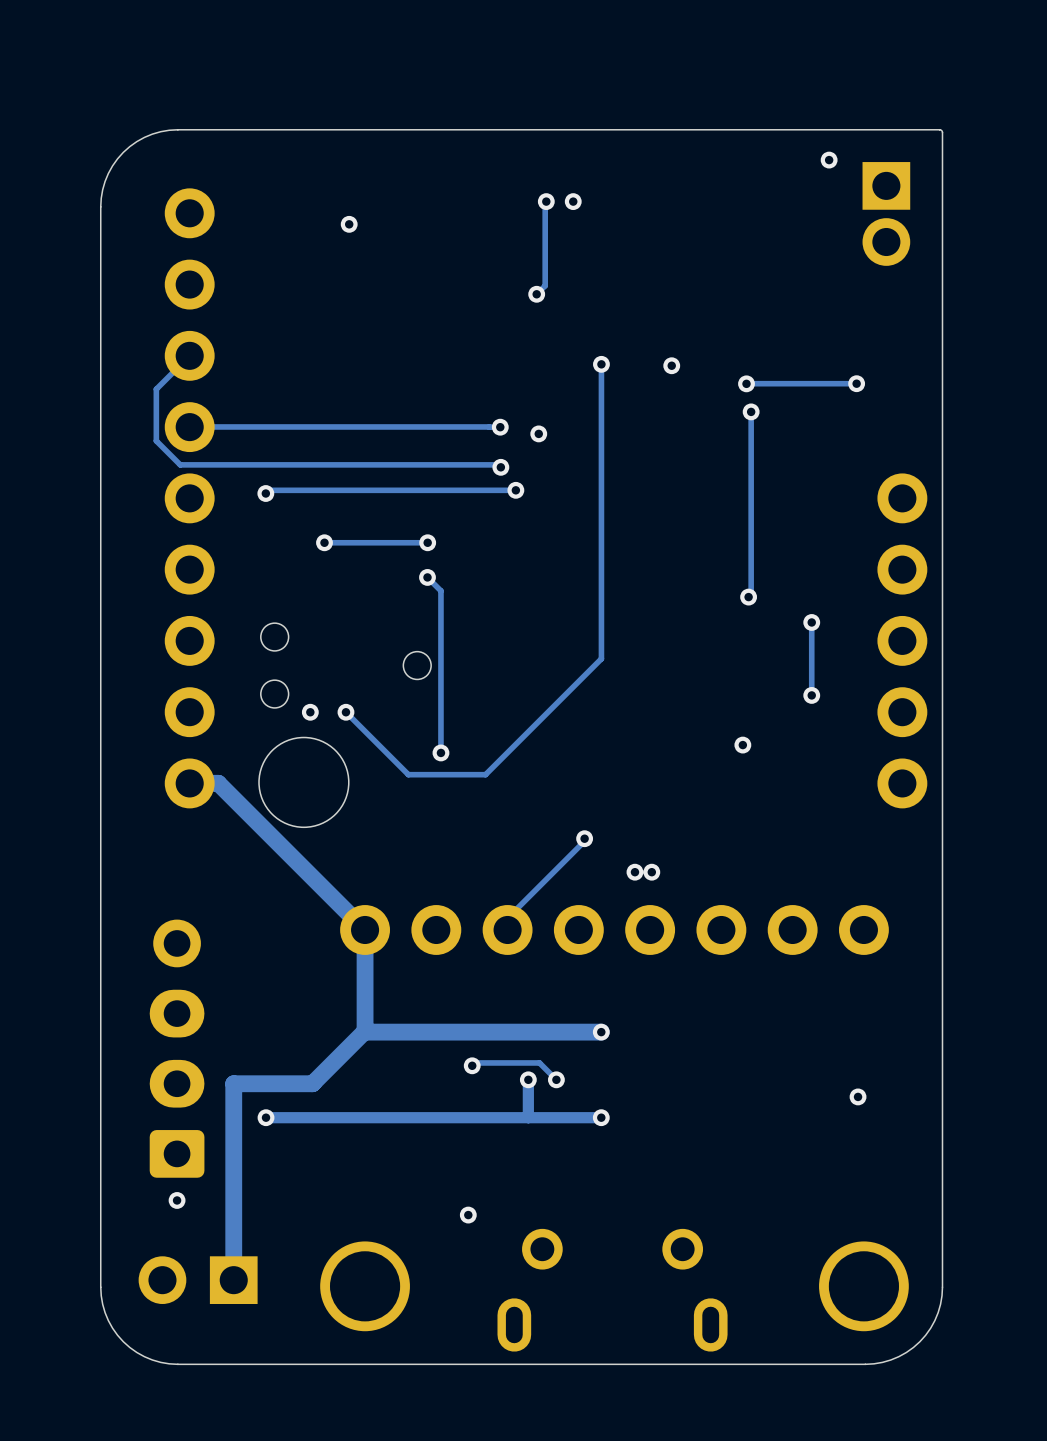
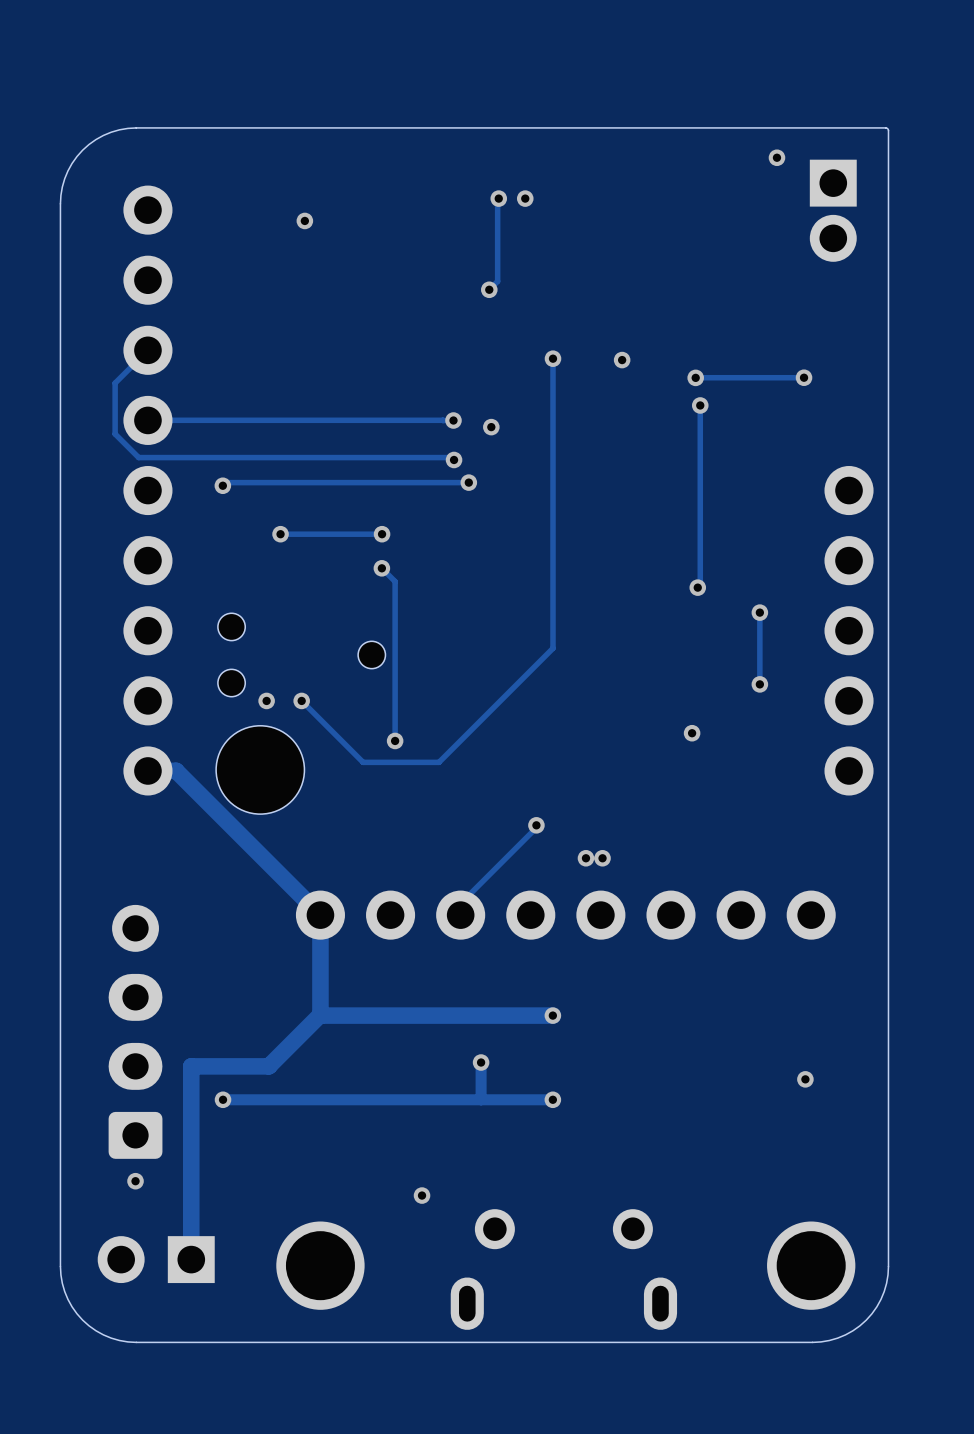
track: (472, 1065) (475, 1062) (539, 1062) (556, 1079) -> none
via: (472, 1065) -> none
via: (556, 1079) -> none

